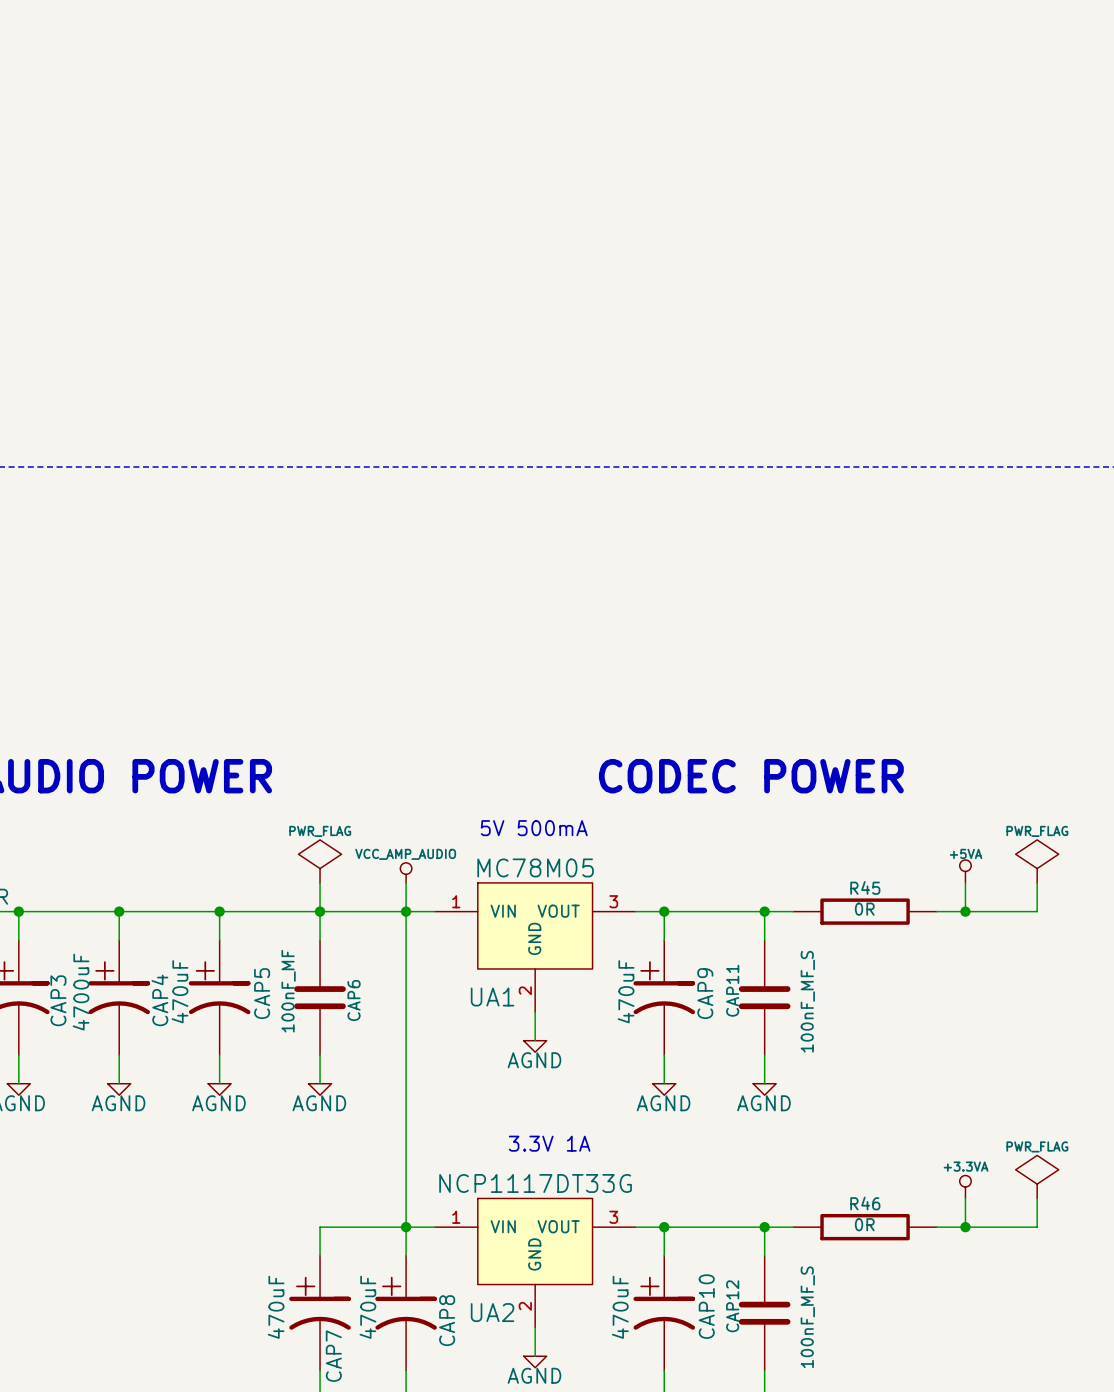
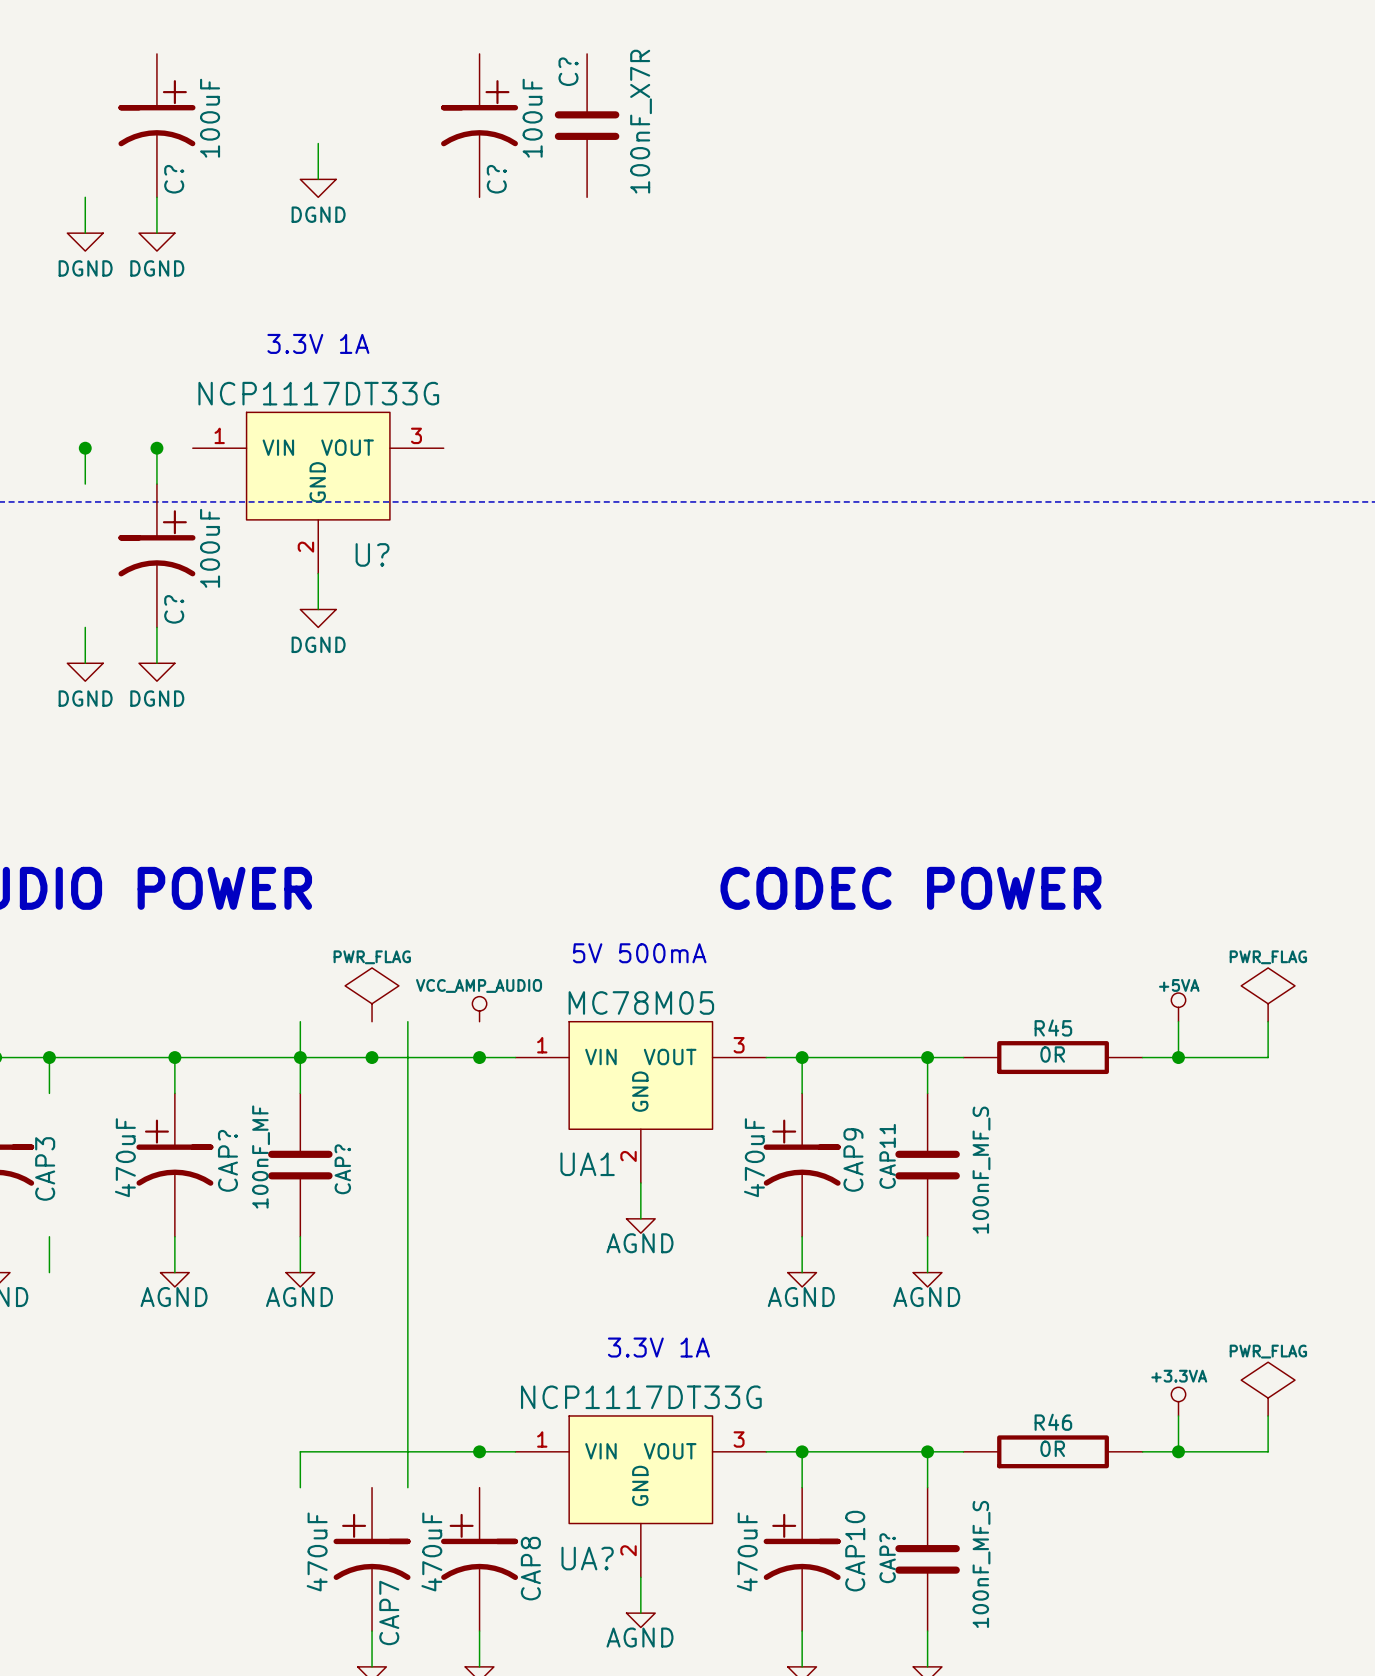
C?: none -> 100uF (156, 125)
C?: none -> 100uF (479, 125)
C?: none -> 100nF_X7R (587, 125)
wire: none -> (318, 143) (318, 179)
power symbol: none -> DGND (318, 188)
wire: none -> (85, 197) (85, 233)
wire: none -> (156, 197) (156, 233)
power symbol: none -> DGND (85, 242)
power symbol: none -> DGND (156, 242)
text: none -> 3.3V 1A (318, 343)
wire: none -> (85, 448) (85, 484)
junction: none -> (85, 448)
wire: none -> (156, 448) (156, 484)
junction: none -> (156, 448)
U?: none -> NCP1117DT33G (318, 493)
C?: none -> 100uF (156, 555)
wire: none -> (318, 573) (318, 609)
power symbol: none -> DGND (318, 618)
wire: none -> (85, 627) (85, 663)
wire: none -> (156, 627) (156, 663)
power symbol: none -> DGND (85, 672)
power symbol: none -> DGND (156, 672)
wire: (320, 882) (320, 940) -> (300, 1021) (300, 1093)
wire: (406, 882) (406, 1255) -> (407, 1021) (407, 1487)
junction: none -> (49, 1057)
wire: (119, 911) (119, 940) -> (49, 1057) (49, 1093)
junction: (119, 911) -> none
junction: none -> (174, 1057)
wire: (219, 911) (219, 940) -> (174, 1057) (174, 1093)
junction: (219, 911) -> none
junction: none -> (300, 1057)
CAP4: 4700uF (119, 997) -> none
CAP?: none -> 470uF (174, 1165)
CAP5: 470uF (219, 997) -> none
CAP?: none -> 100nF_MF (300, 1165)
CAP6: 100nF_MF (320, 997) -> none
wire: (119, 1055) (119, 1083) -> (49, 1236) (49, 1272)
wire: (219, 1055) (219, 1083) -> (174, 1236) (174, 1272)
wire: (320, 1055) (320, 1083) -> (300, 1236) (300, 1272)
power symbol: AGND (119, 1089) -> none
power symbol: none -> AGND (174, 1279)
power symbol: AGND (219, 1089) -> none
power symbol: none -> AGND (300, 1279)
power symbol: AGND (320, 1089) -> none
wire: (320, 1227) (320, 1255) -> (372, 1451) (300, 1451) (300, 1487)
CAP12 name: CAP12 (732, 1306) -> CAP? (887, 1558)
UA2 name: UA2 (492, 1312) -> UA? (587, 1558)

